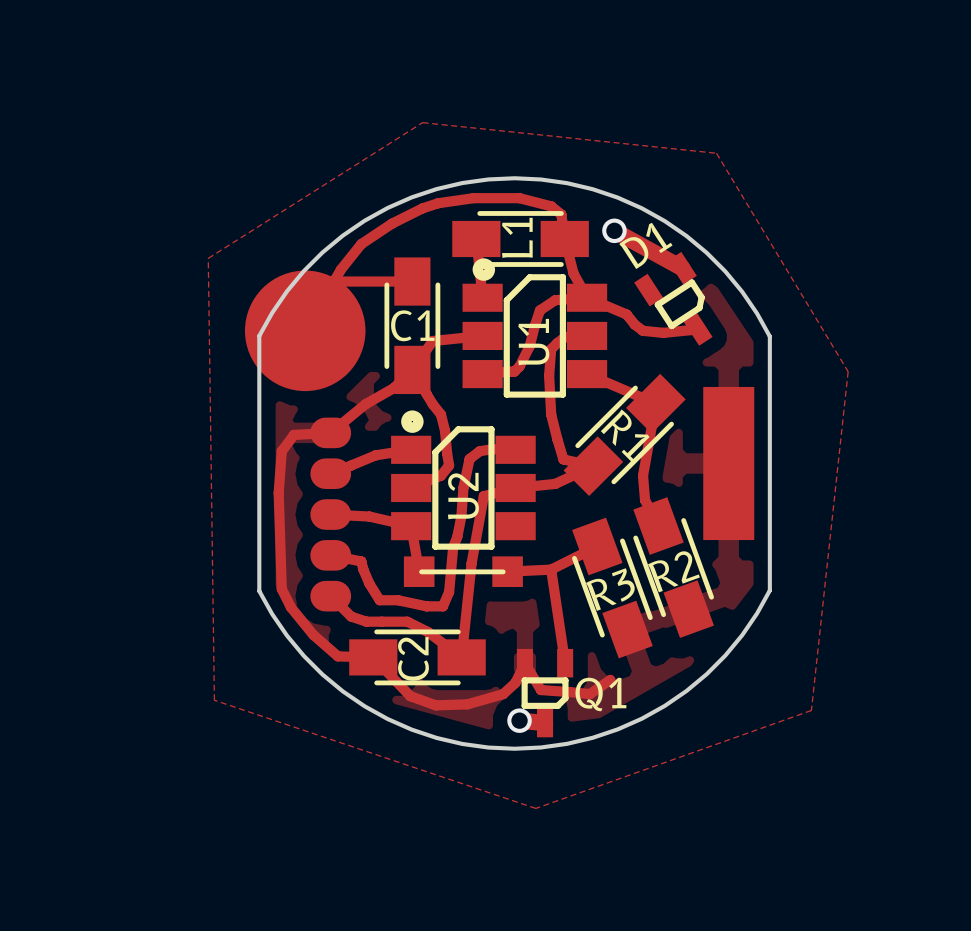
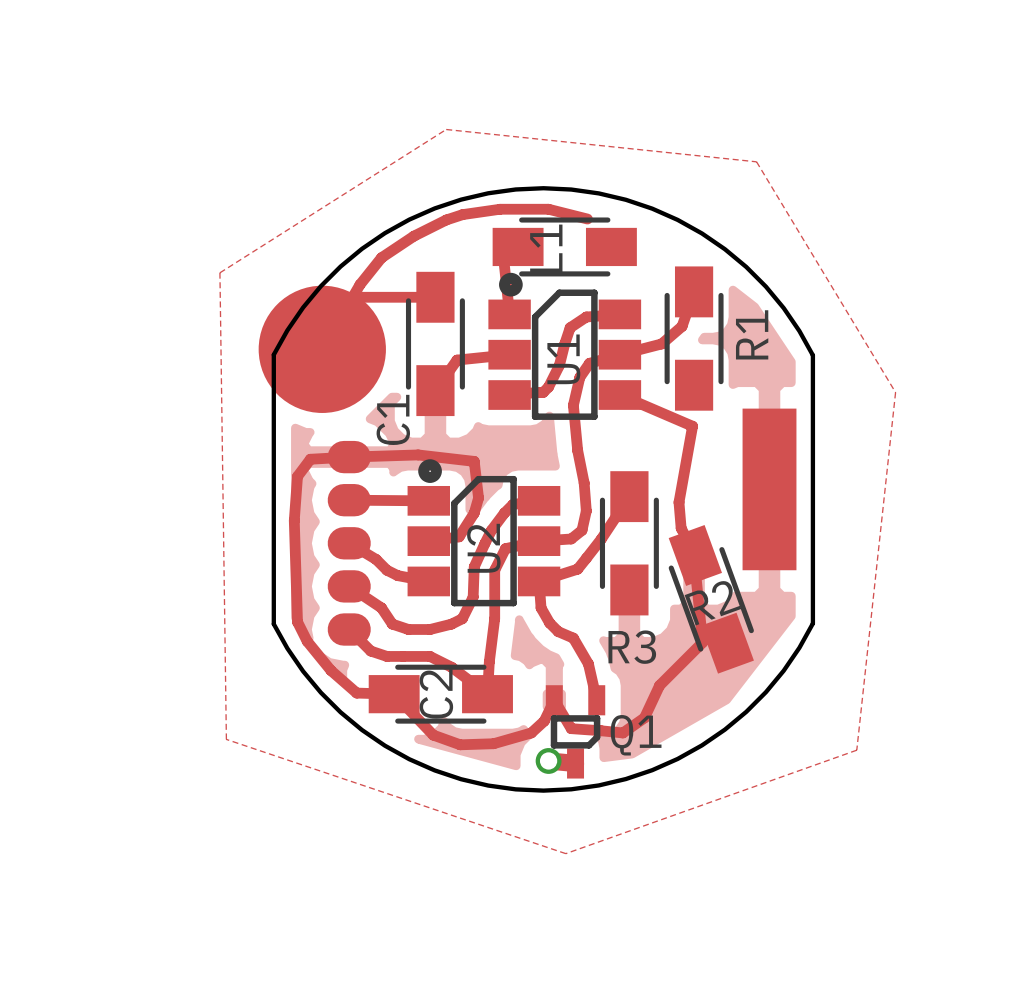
track: (519, 198) (551, 206) (561, 214) (564, 238) (573, 273) (587, 297) (626, 314) (643, 330) (663, 332) (698, 329) -> (548, 209) (587, 219)
track: (614, 230) (682, 268) -> none
via: (614, 230) -> none
L1 position: (520, 238) -> (564, 246)
D1: (673, 298) -> none
C1 name rotation: 0° (412, 325) -> 90° counterclockwise (393, 419)
C1 name position: C1 (412, 325) -> C1 (393, 419)
track: (587, 335) (565, 336) (551, 349) (549, 375) (551, 414) (563, 459) (593, 466) (555, 483) (515, 487) (483, 496) (471, 563) (461, 657) -> (694, 291) (682, 326) (661, 343) (589, 363) (579, 377) (573, 405) (586, 510) (582, 530) (571, 538) (539, 541) (505, 548) (494, 570) (494, 618) (487, 694)
track: (330, 432) (365, 404) (394, 387) (412, 369) (440, 414) (449, 465) (440, 475) (411, 487) -> (349, 457) (418, 454) (474, 461) (478, 498) (474, 513) (459, 536) (428, 541)
R1 rotation: 0° (624, 434) -> 45° counterclockwise (694, 338)
R1 position: (624, 434) -> (694, 338)
track: (411, 449) (375, 455) (330, 473) -> (428, 500) (349, 500)
track: (515, 449) (491, 449) (479, 451) (469, 458) (463, 487) (461, 516) (453, 547) (449, 592) (443, 606) (426, 606) (398, 600) (379, 600) (369, 583) (361, 561) (330, 555) -> (539, 500) (513, 504) (491, 530) (474, 567) (473, 597) (462, 618) (451, 624) (430, 629) (408, 629) (392, 624) (381, 607) (349, 586)
U2 position: (463, 480) -> (483, 532)
track: (330, 514) (369, 516) (411, 526) (419, 571) -> (349, 543) (397, 575) (428, 581)
track: none -> (694, 557) (702, 642) (659, 685) (644, 717)
track: (597, 546) (551, 569) -> none
track: (551, 569) (565, 663) -> (629, 496) (601, 538) (577, 569) (539, 581) (541, 607) (549, 623) (558, 631) (573, 638) (588, 663) (596, 700)
track: (551, 569) (507, 571) -> none
part: (463, 571) -> none
R3 rotation: 0° (612, 588) -> 20° clockwise (629, 543)
R3 name position: R3 (610, 589) -> R3 (632, 647)

